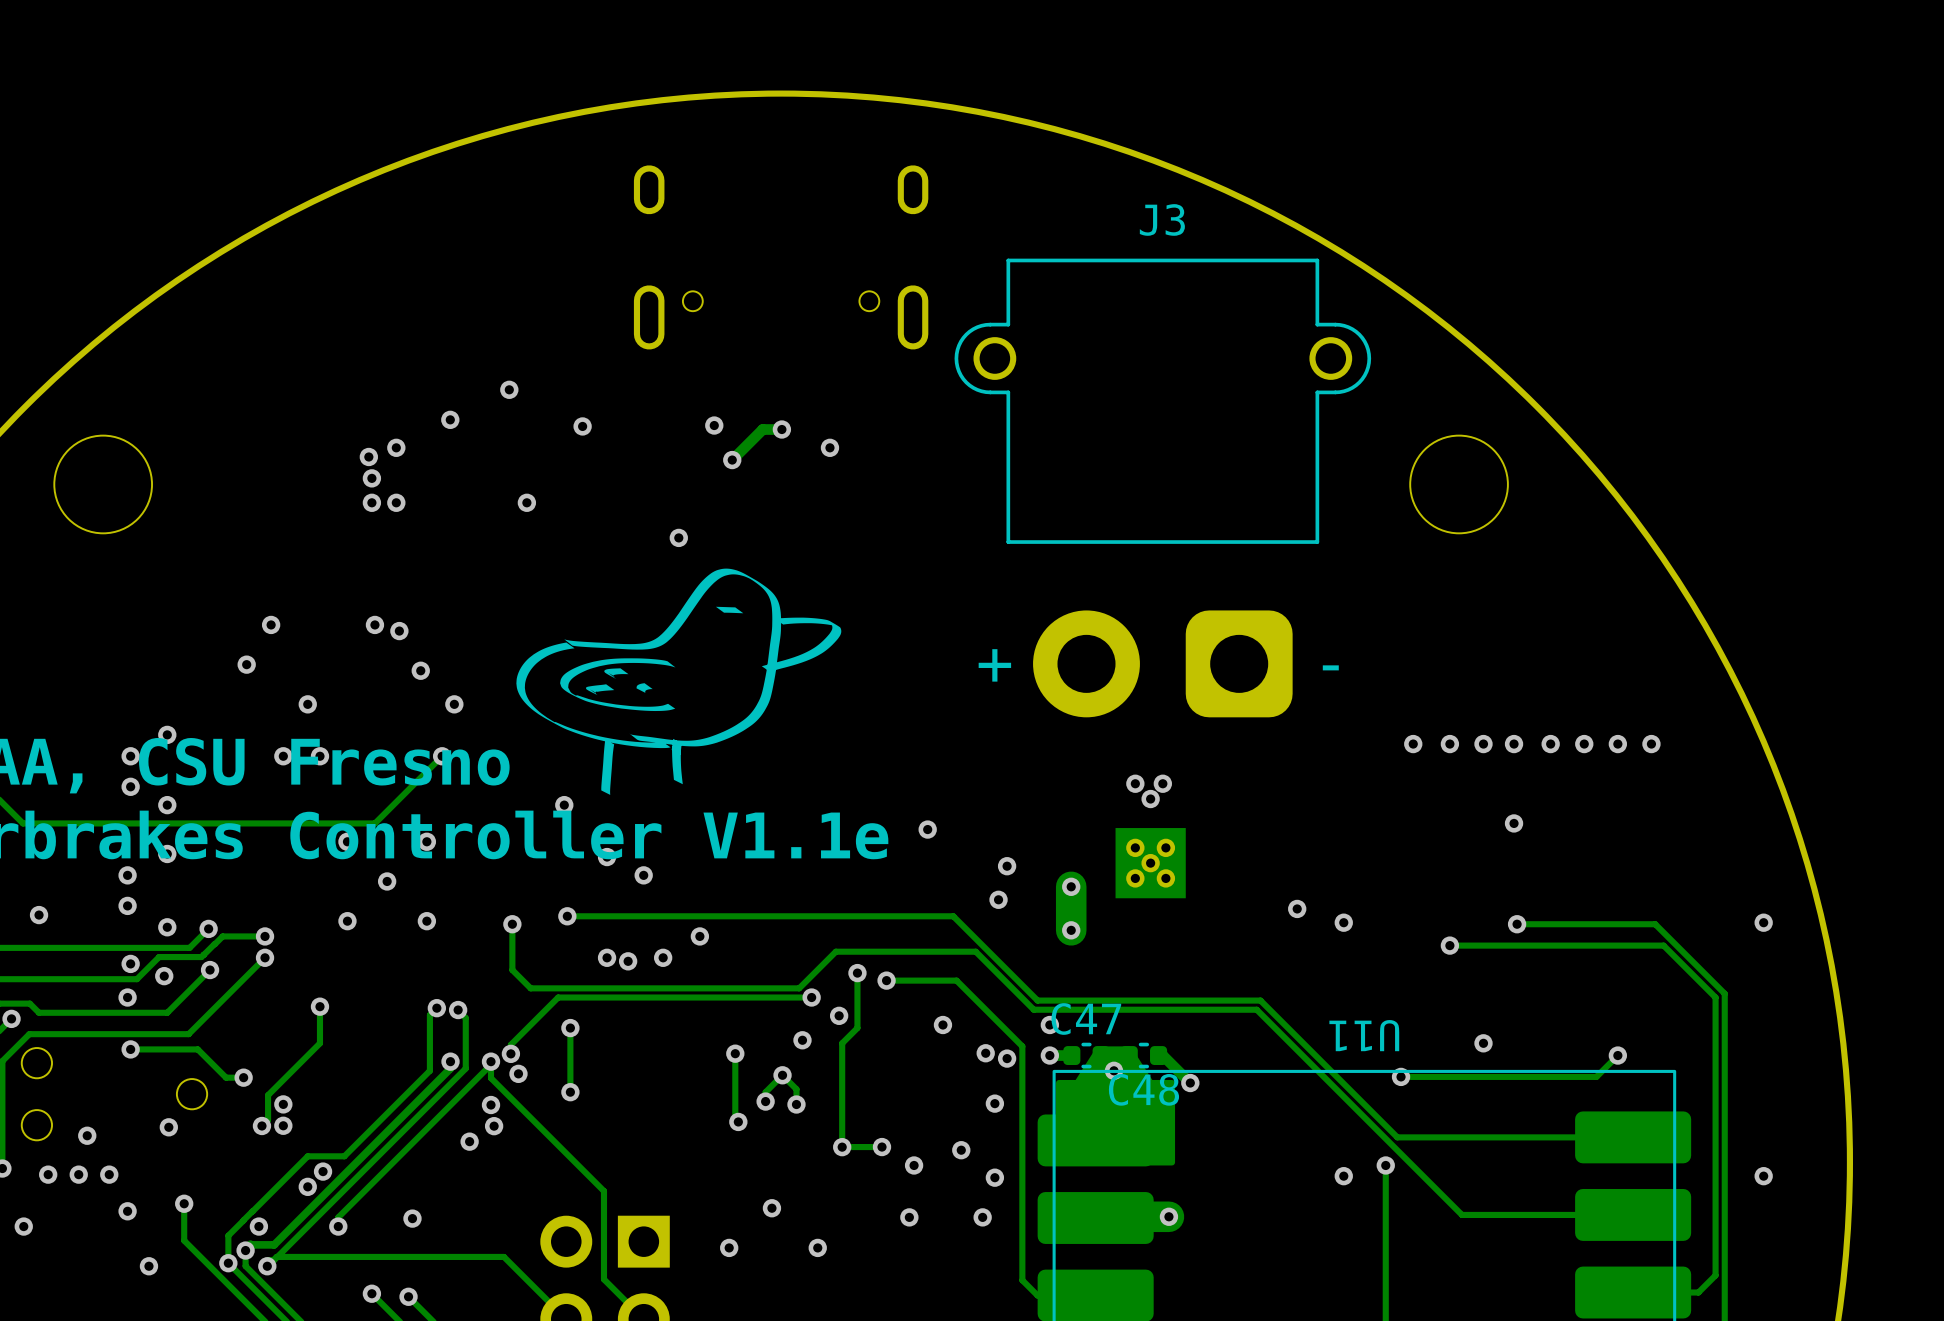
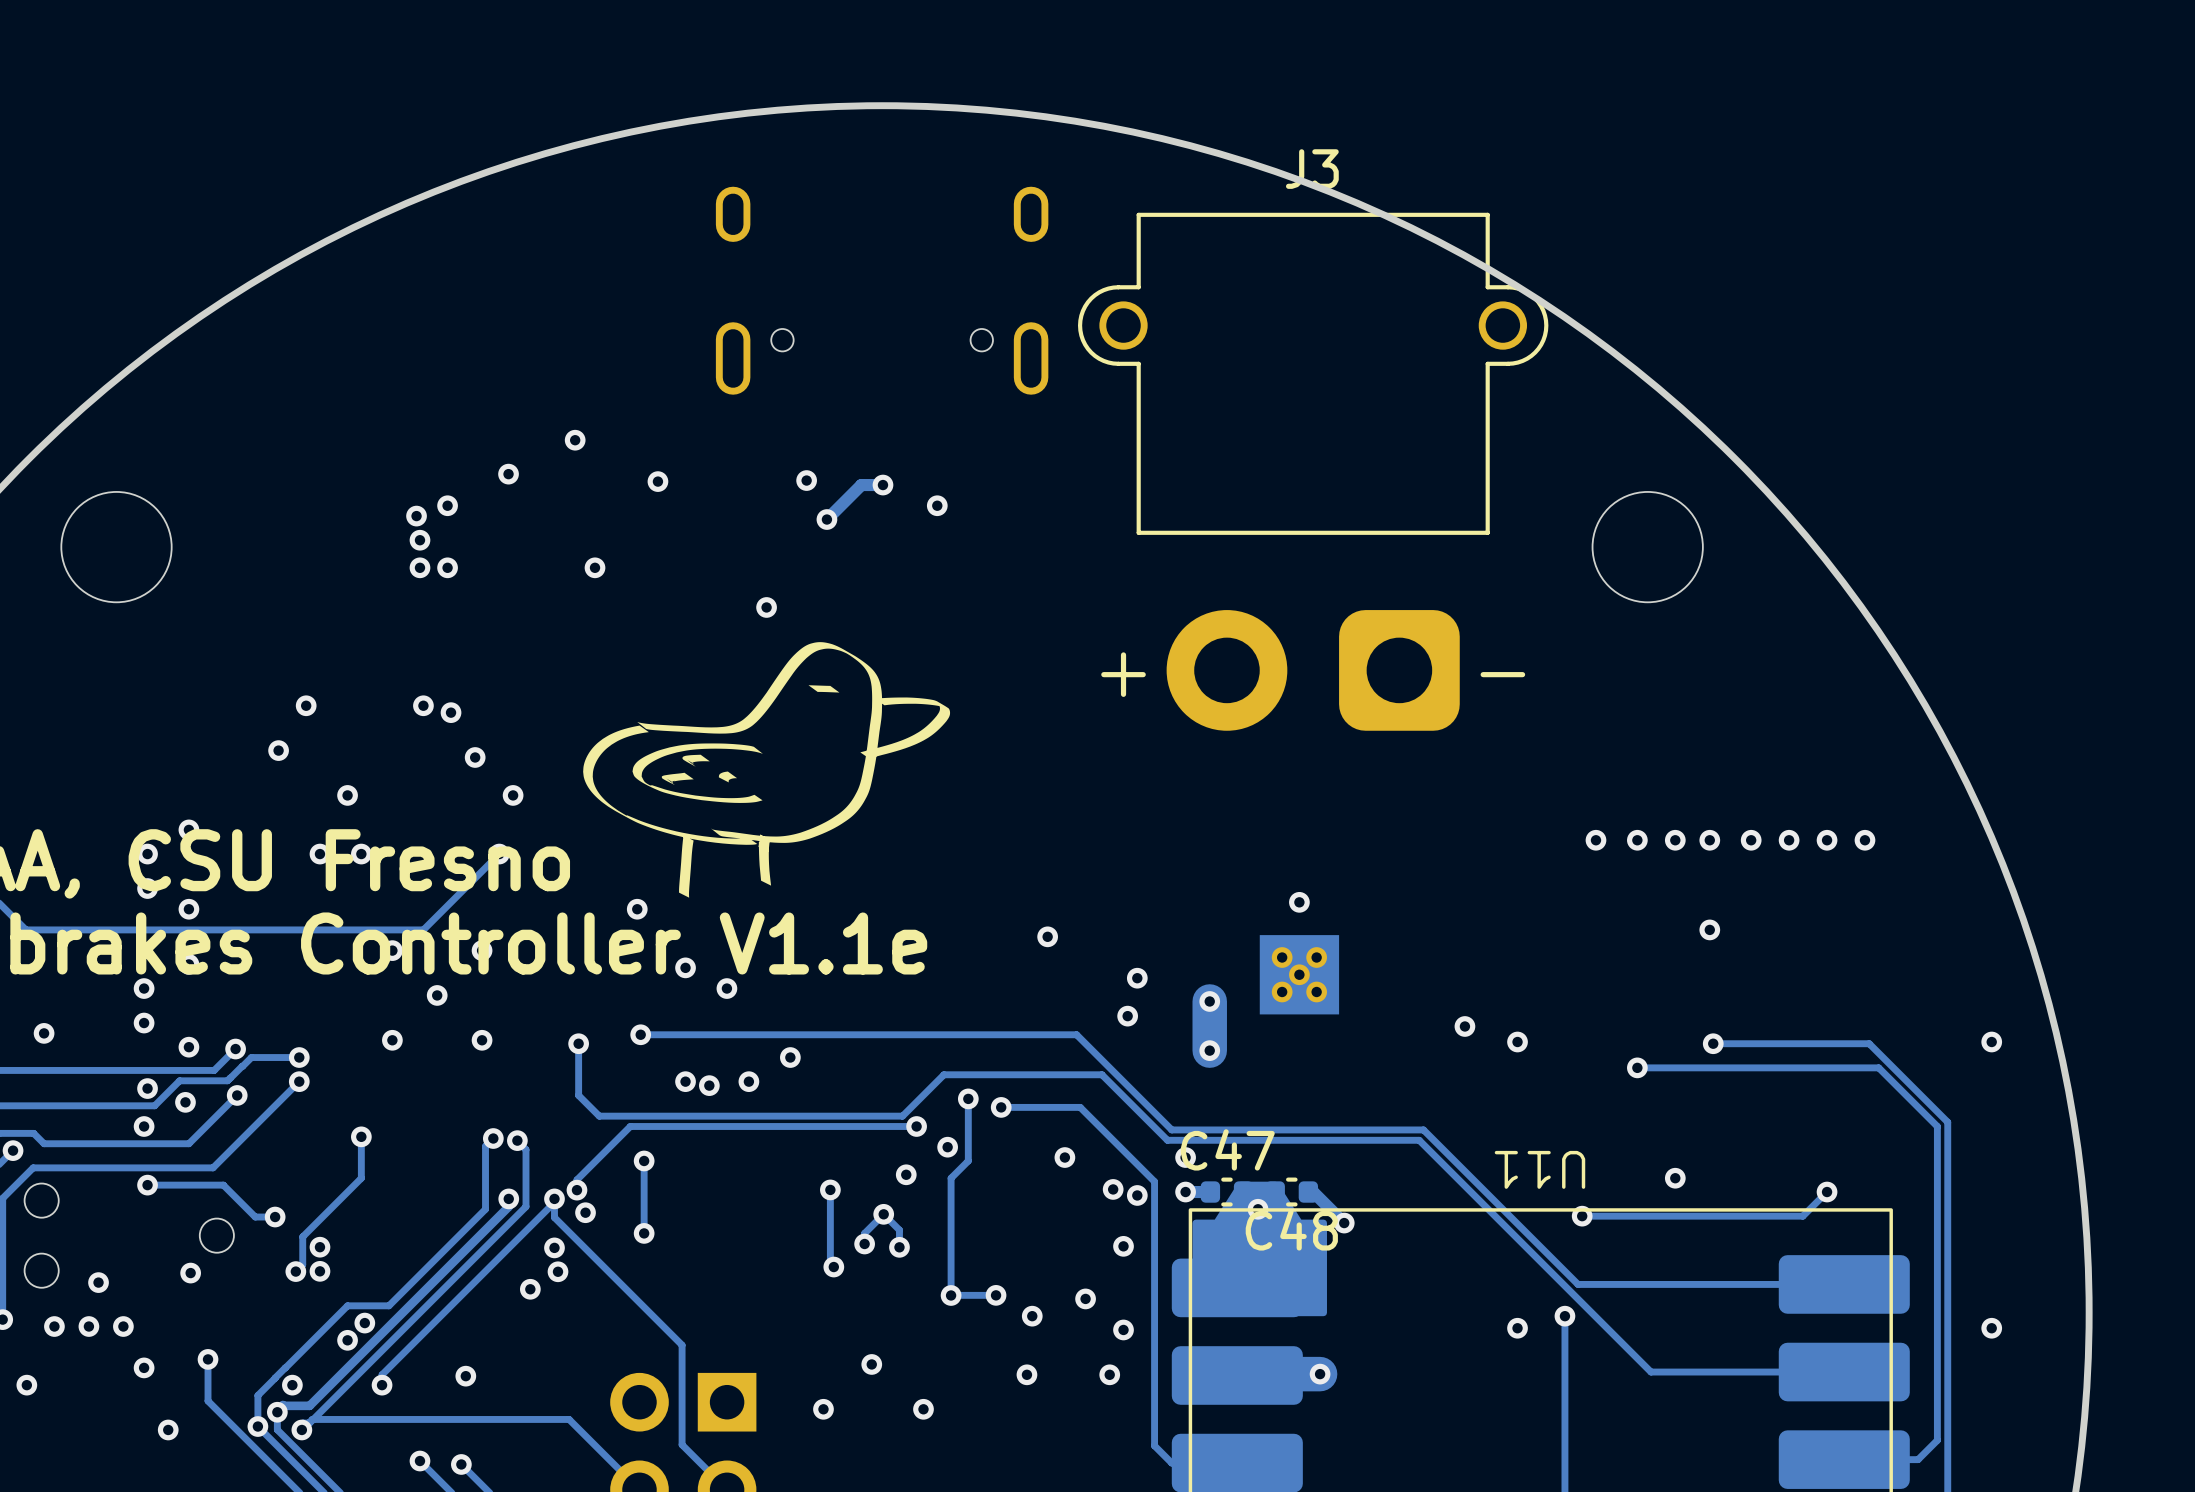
J3 position: (1162, 487) -> (1313, 471)
via: (1135, 783) -> none
via: (1162, 783) -> none

